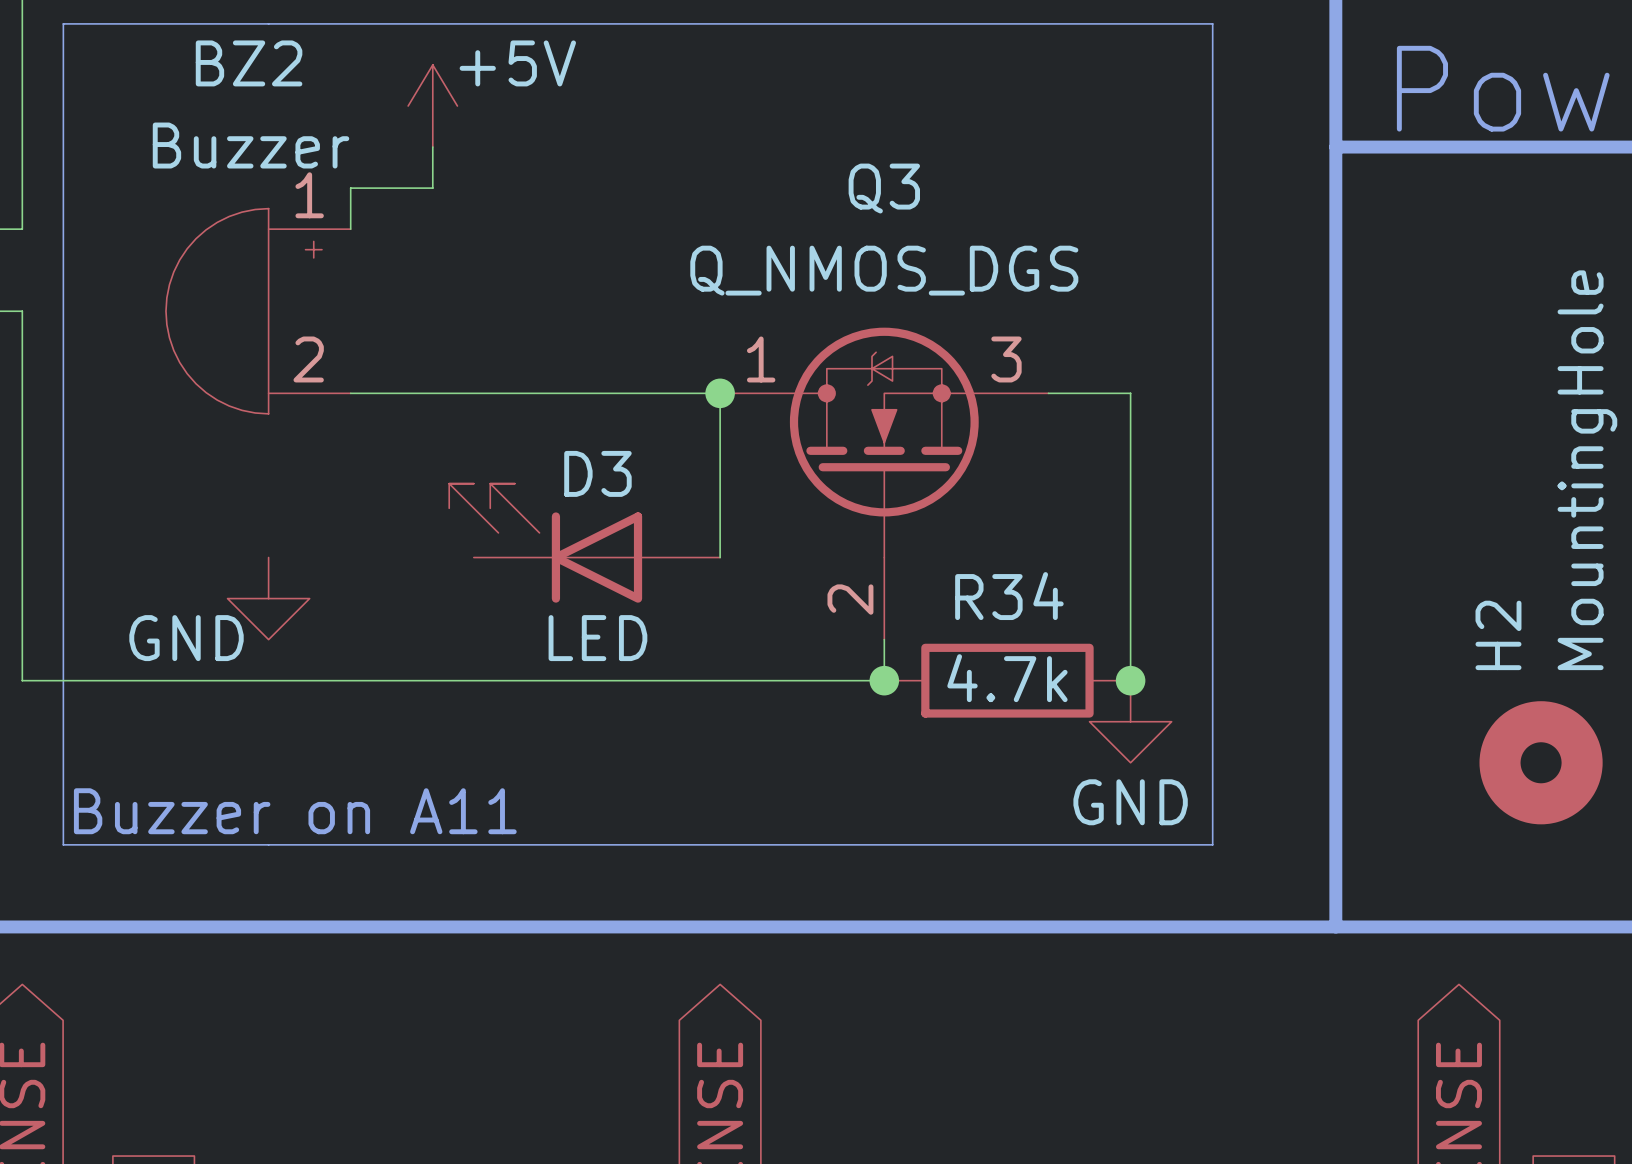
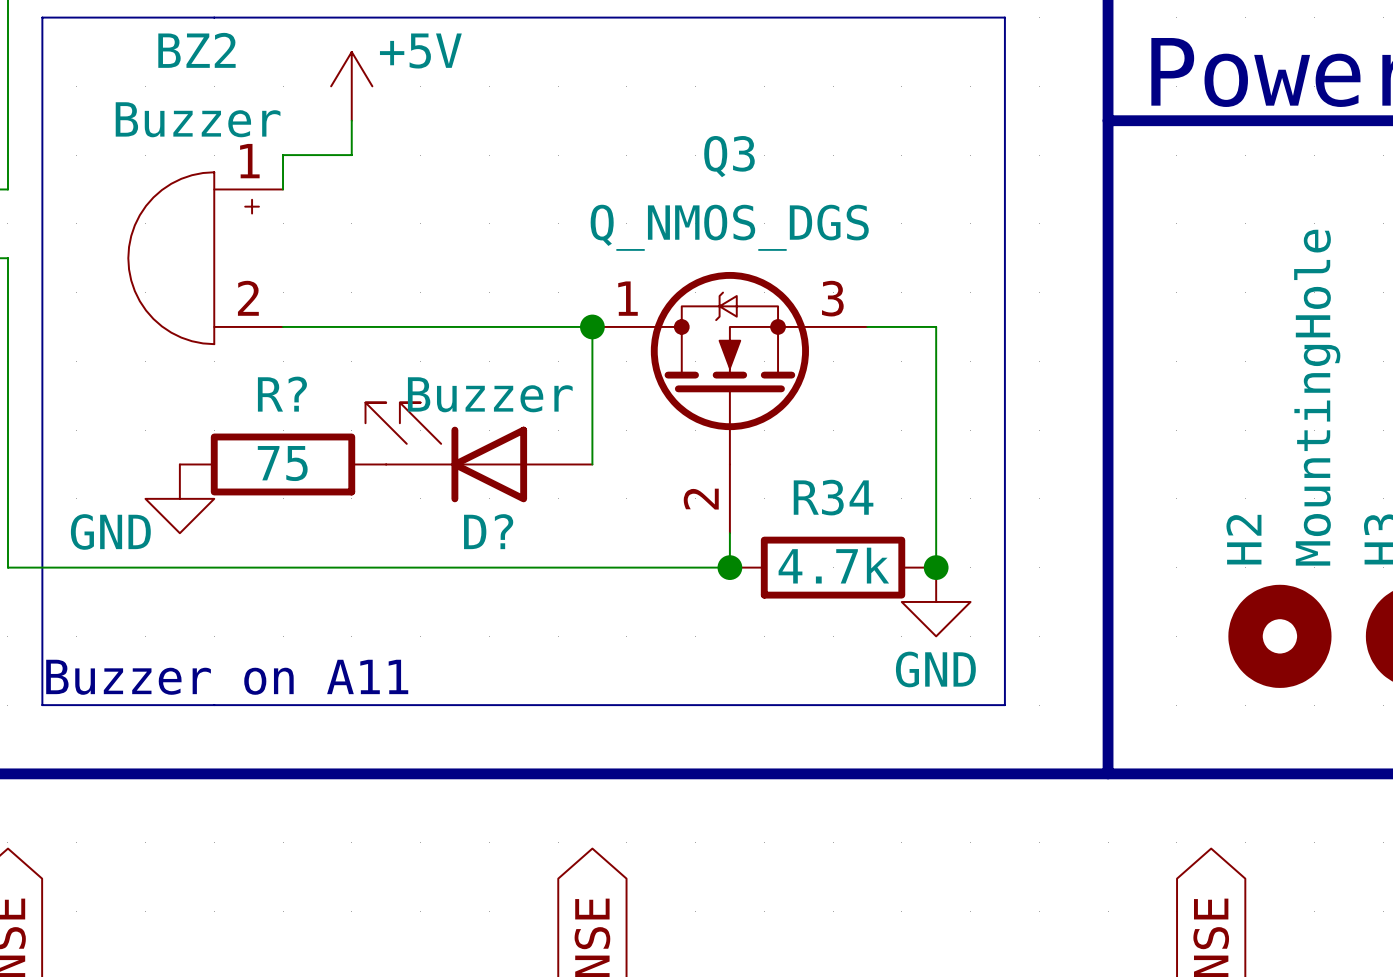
D3 name: D3 (597, 473) -> D? (488, 531)
R?: none -> 75 (283, 464)
power symbol position: GND (268, 598) -> GND (179, 498)
D3 value: LED (597, 638) -> Buzzer (490, 394)

